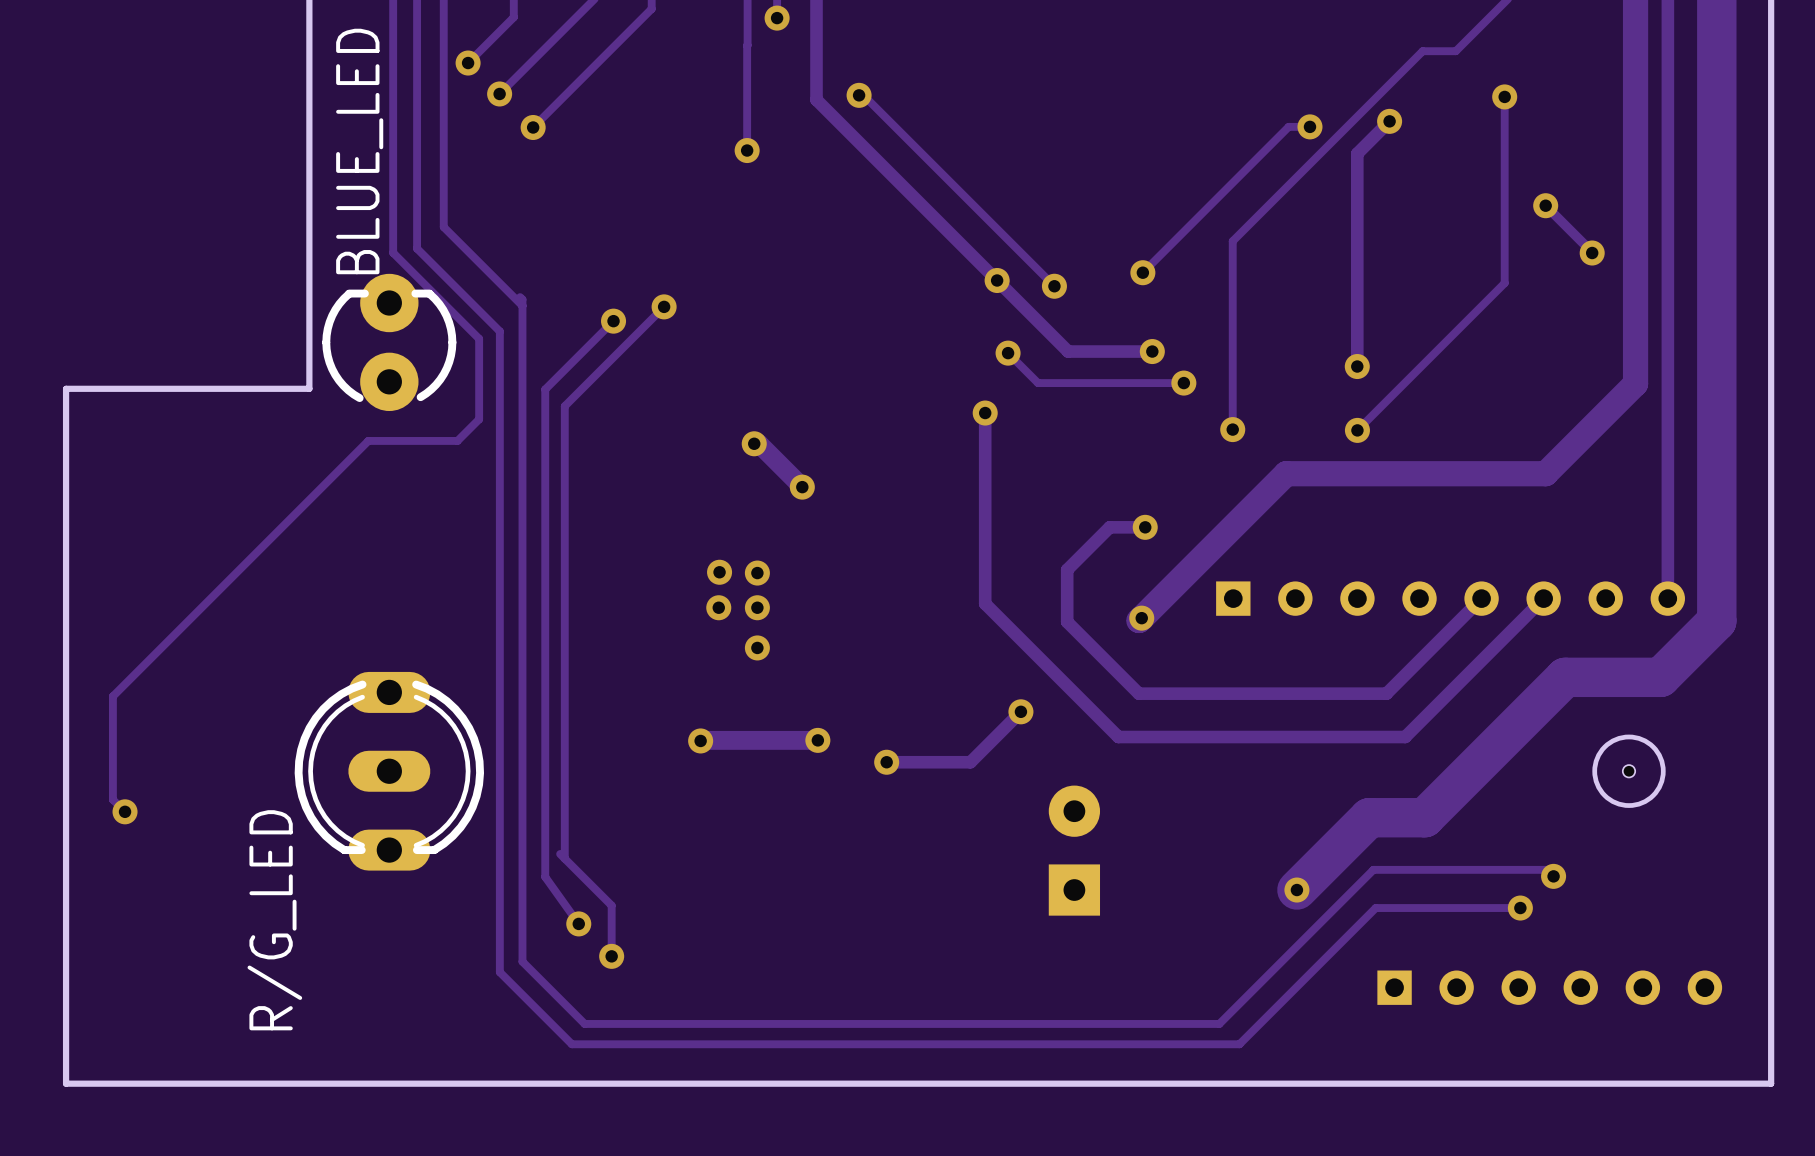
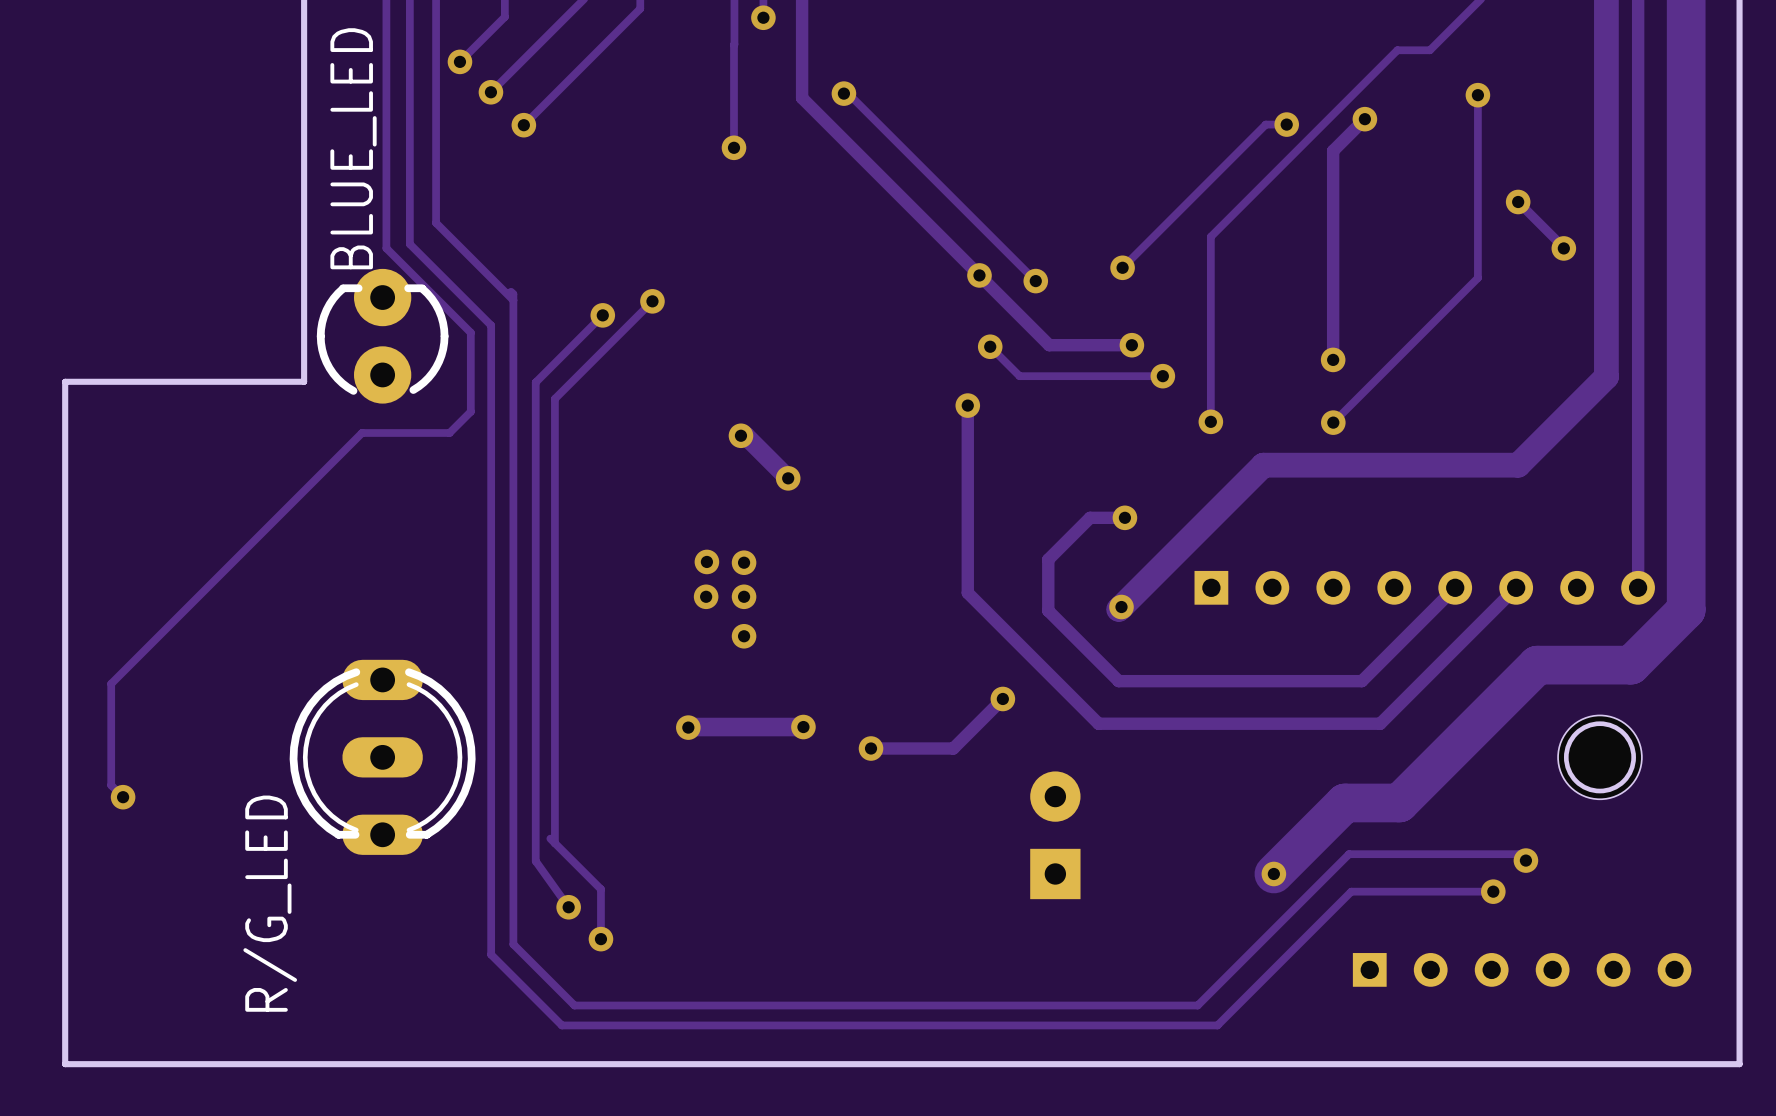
hole size: [1622, 765, 1636, 778] -> [1558, 715, 1642, 800]

